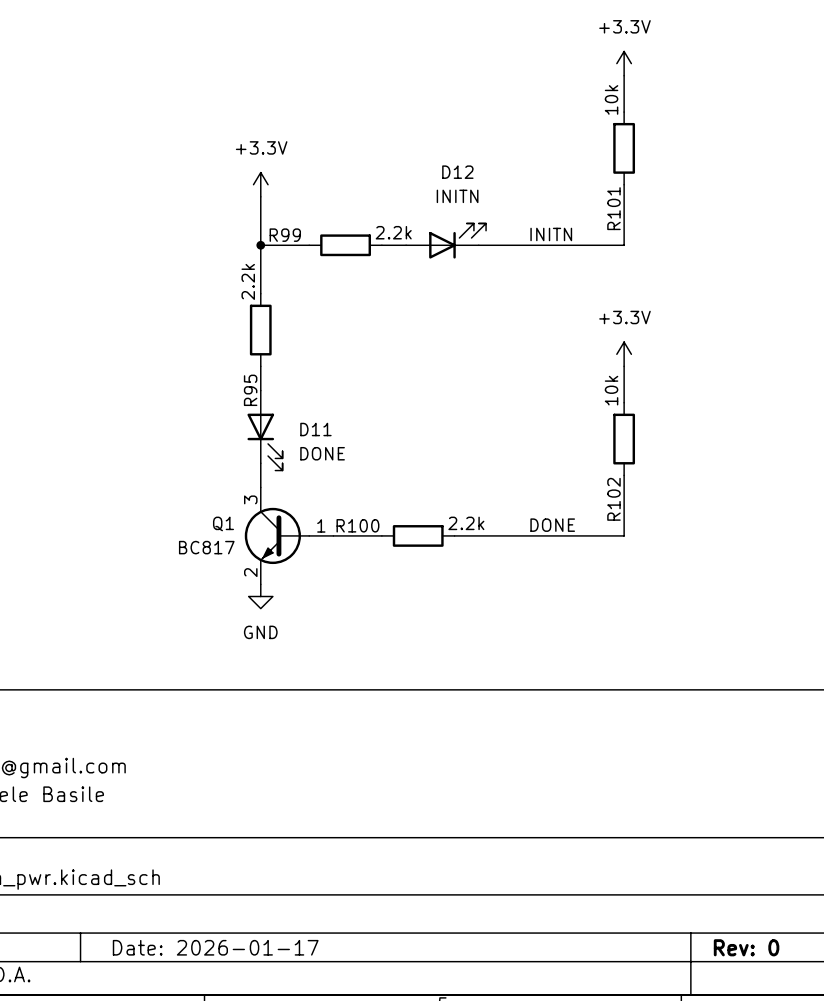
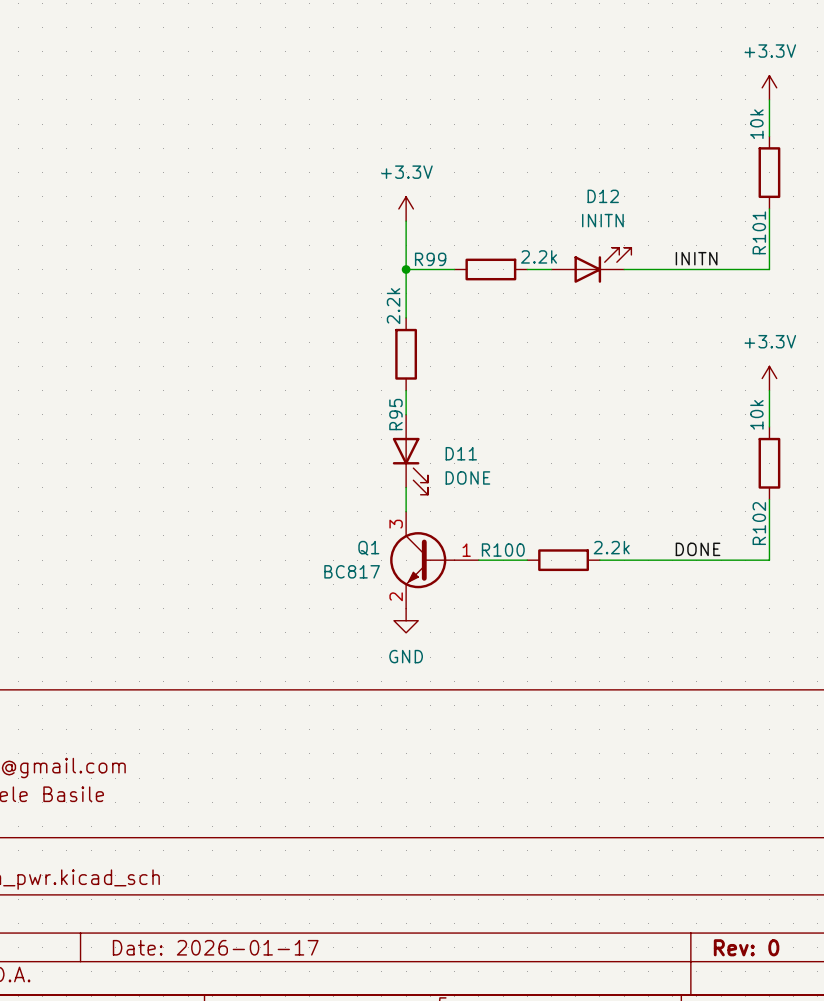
power symbol: +3.3V (624, 63) -> none
wire: (624, 75) (624, 112) -> (769, 99) (769, 136)
power symbol: none -> +3.3V (769, 87)
R101 position: (624, 148) -> (769, 172)
power symbol: +3.3V (260, 184) -> none
wire: (624, 184) (624, 245) (478, 245) -> (769, 208) (769, 269) (624, 269)
wire: (260, 196) (260, 293) -> (406, 221) (406, 317)
power symbol: none -> +3.3V (406, 208)
label position: INITN (551, 234) -> INITN (696, 258)
D12 position: (446, 241) -> (591, 265)
wire: (260, 245) (309, 245) -> (406, 269) (454, 269)
junction: (260, 245) -> none
R99 position: (345, 245) -> (490, 269)
wire: (381, 245) (406, 245) -> (527, 269) (551, 269)
junction: none -> (406, 269)
R95 position: (260, 330) -> (406, 354)
power symbol: +3.3V (624, 354) -> none
wire: (260, 366) (260, 390) -> (406, 390) (406, 414)
wire: (624, 366) (624, 402) -> (769, 390) (769, 426)
power symbol: none -> +3.3V (769, 378)
D11 position: (265, 430) -> (410, 454)
R102 position: (624, 439) -> (769, 463)
wire: (260, 463) (260, 487) -> (406, 487) (406, 511)
wire: (624, 475) (624, 535) (454, 535) -> (769, 499) (769, 560) (599, 560)
label position: DONE (552, 525) -> DONE (698, 549)
Q1 position: (289, 535) -> (434, 560)
wire: (333, 535) (381, 535) -> (478, 560) (527, 560)
R100 position: (418, 535) -> (563, 560)
power symbol position: GND (260, 596) -> GND (406, 620)

